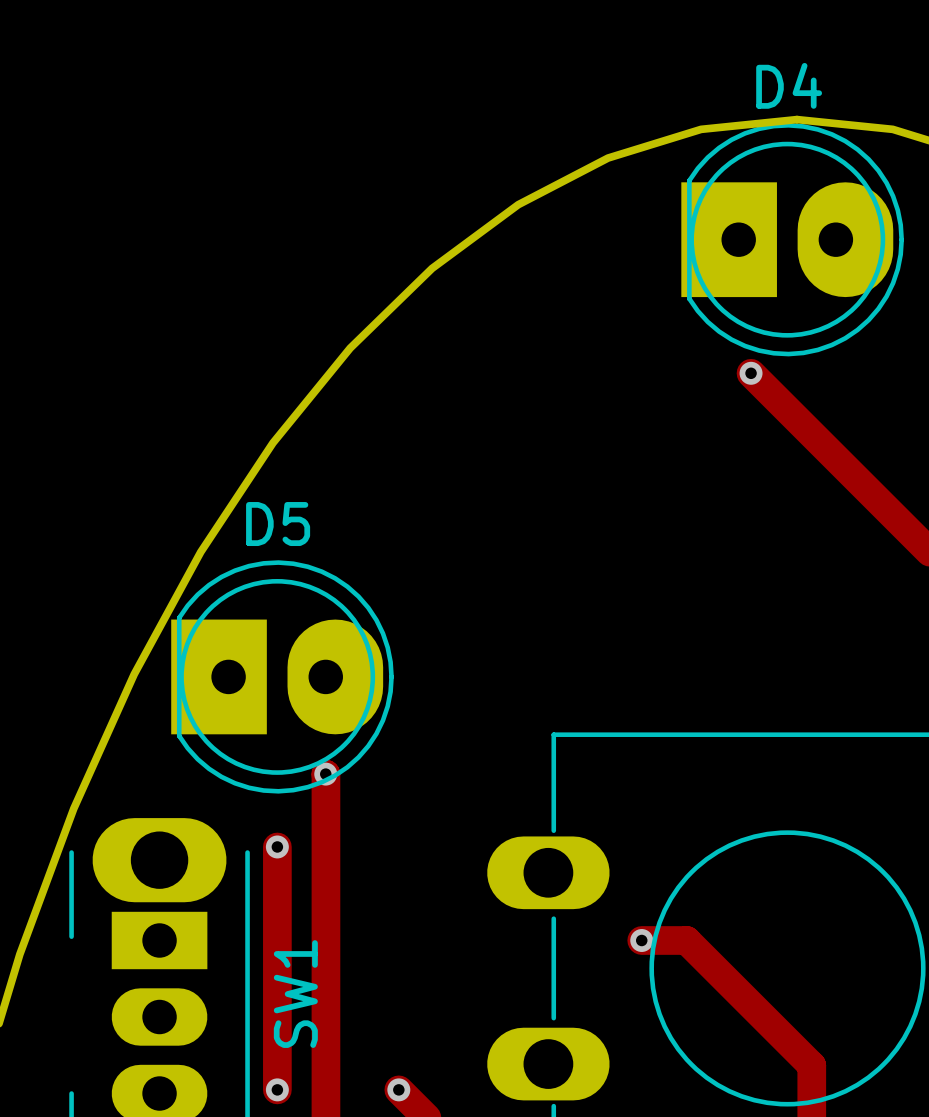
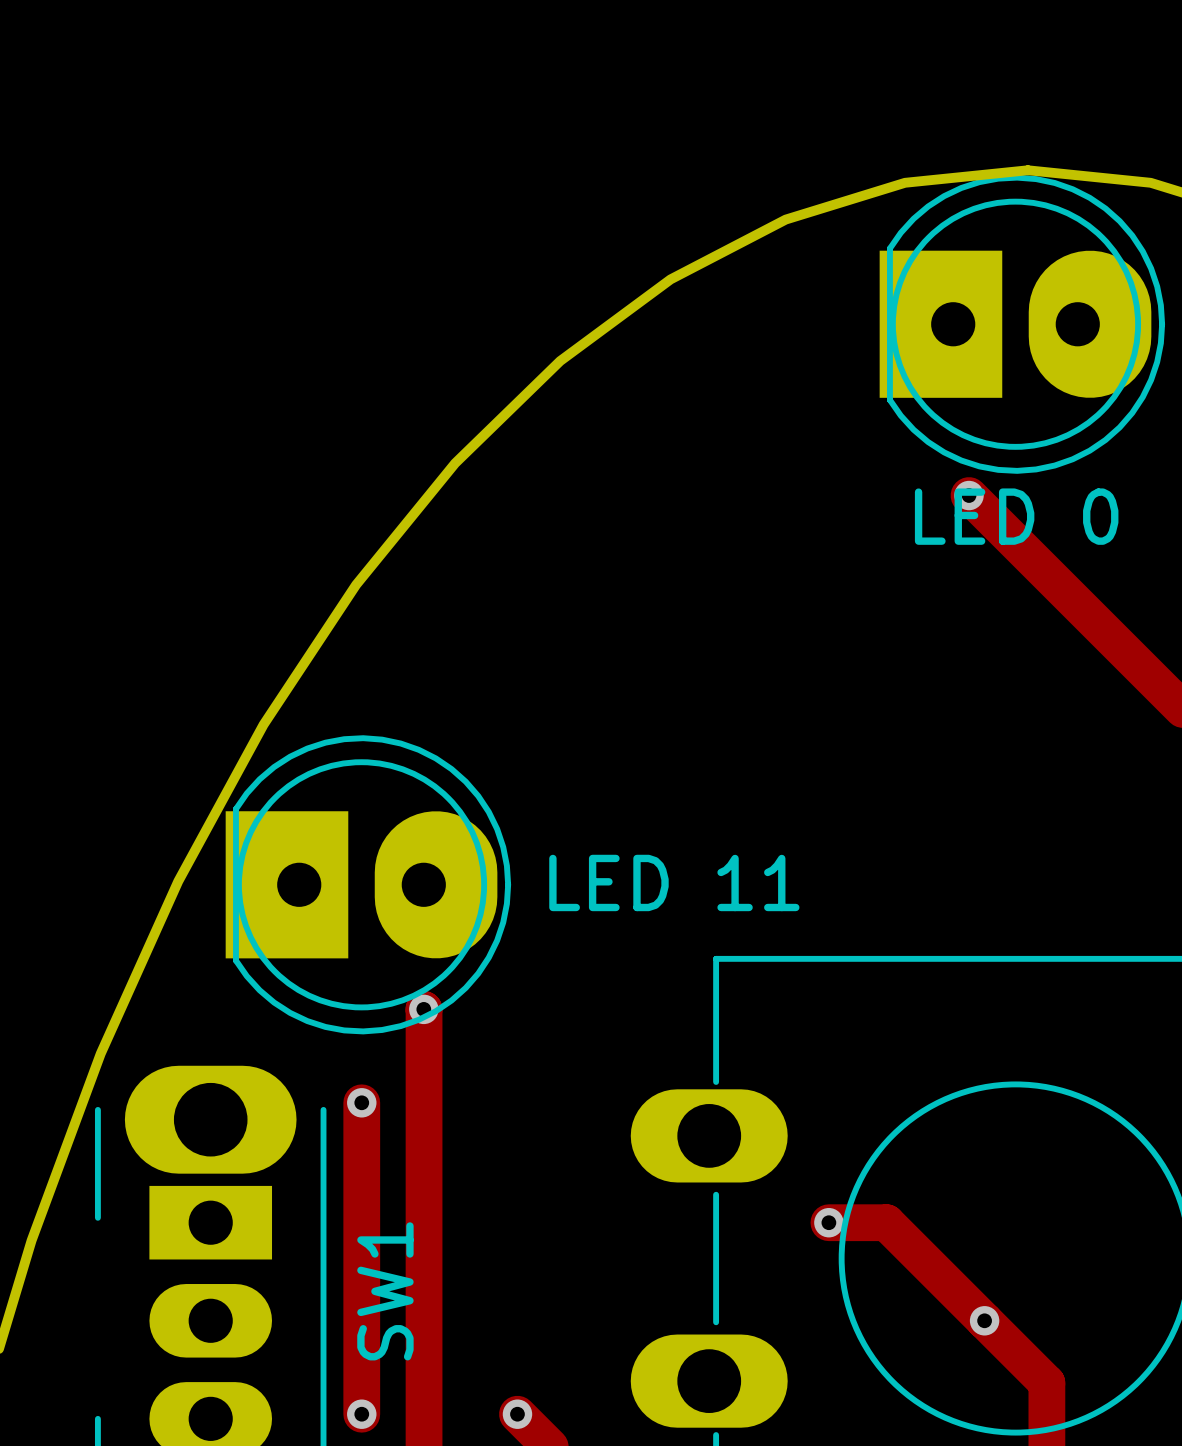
D4 name: D4 (789, 85) -> none
D4 value: none -> LED 0 (1016, 516)
D5 name: D5 (278, 524) -> none
D5 value: none -> LED 11 (674, 882)
via: none -> (984, 1320)

